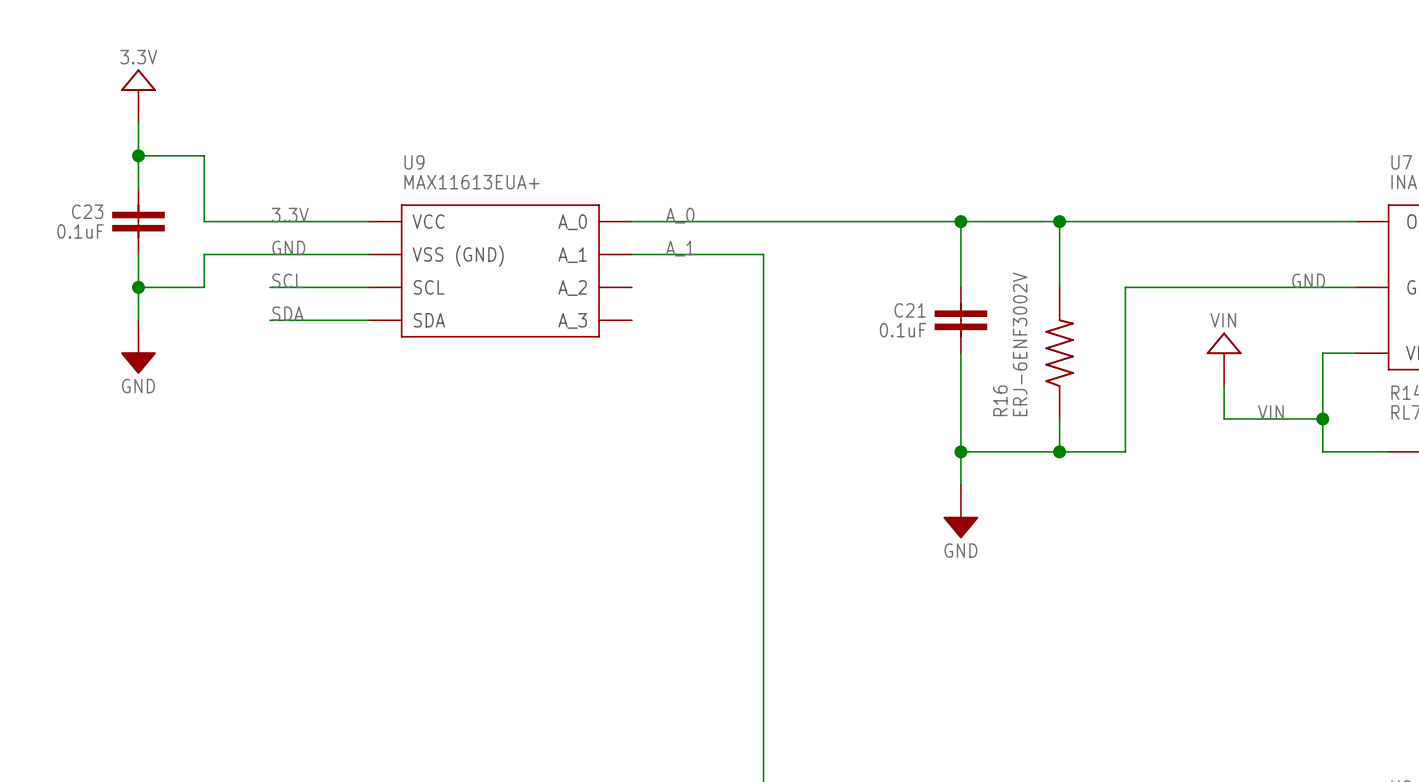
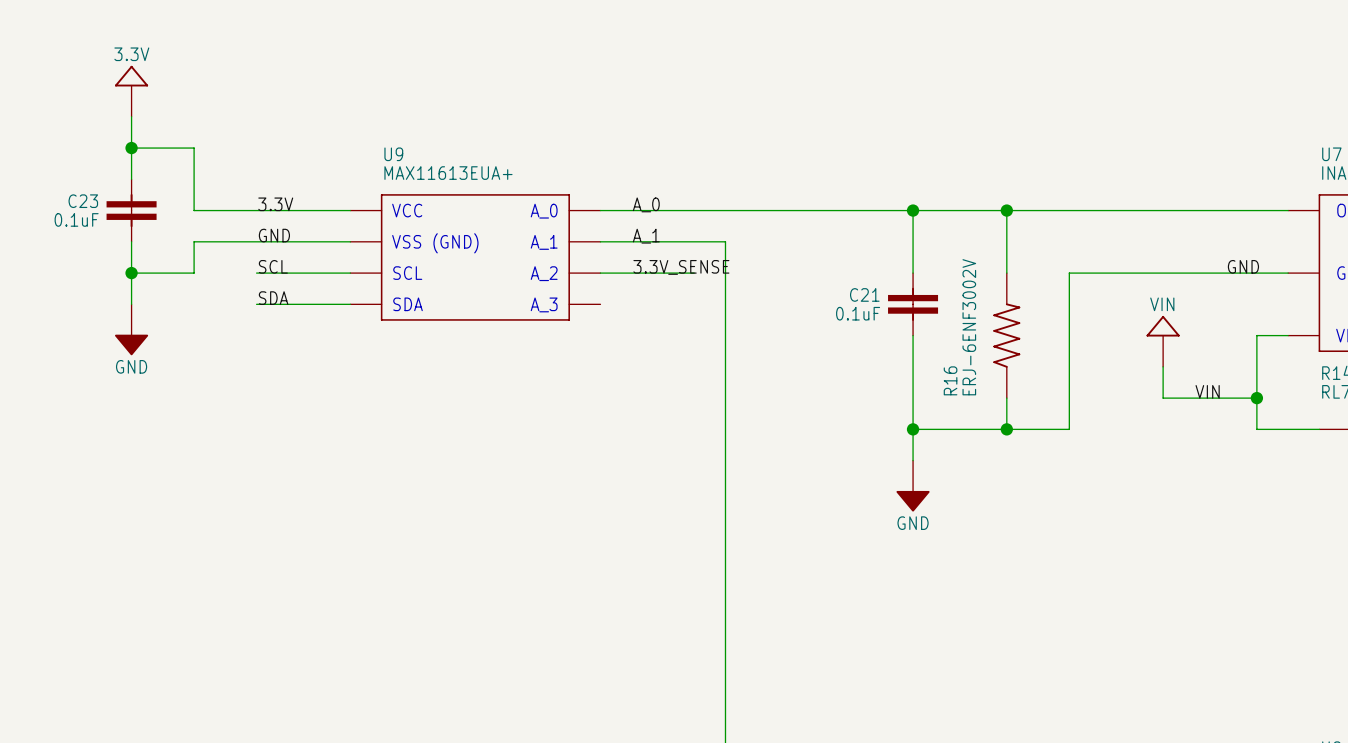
label: none -> 3.3V_SENSE (681, 267)
wire: none -> (600, 273) (694, 273)

